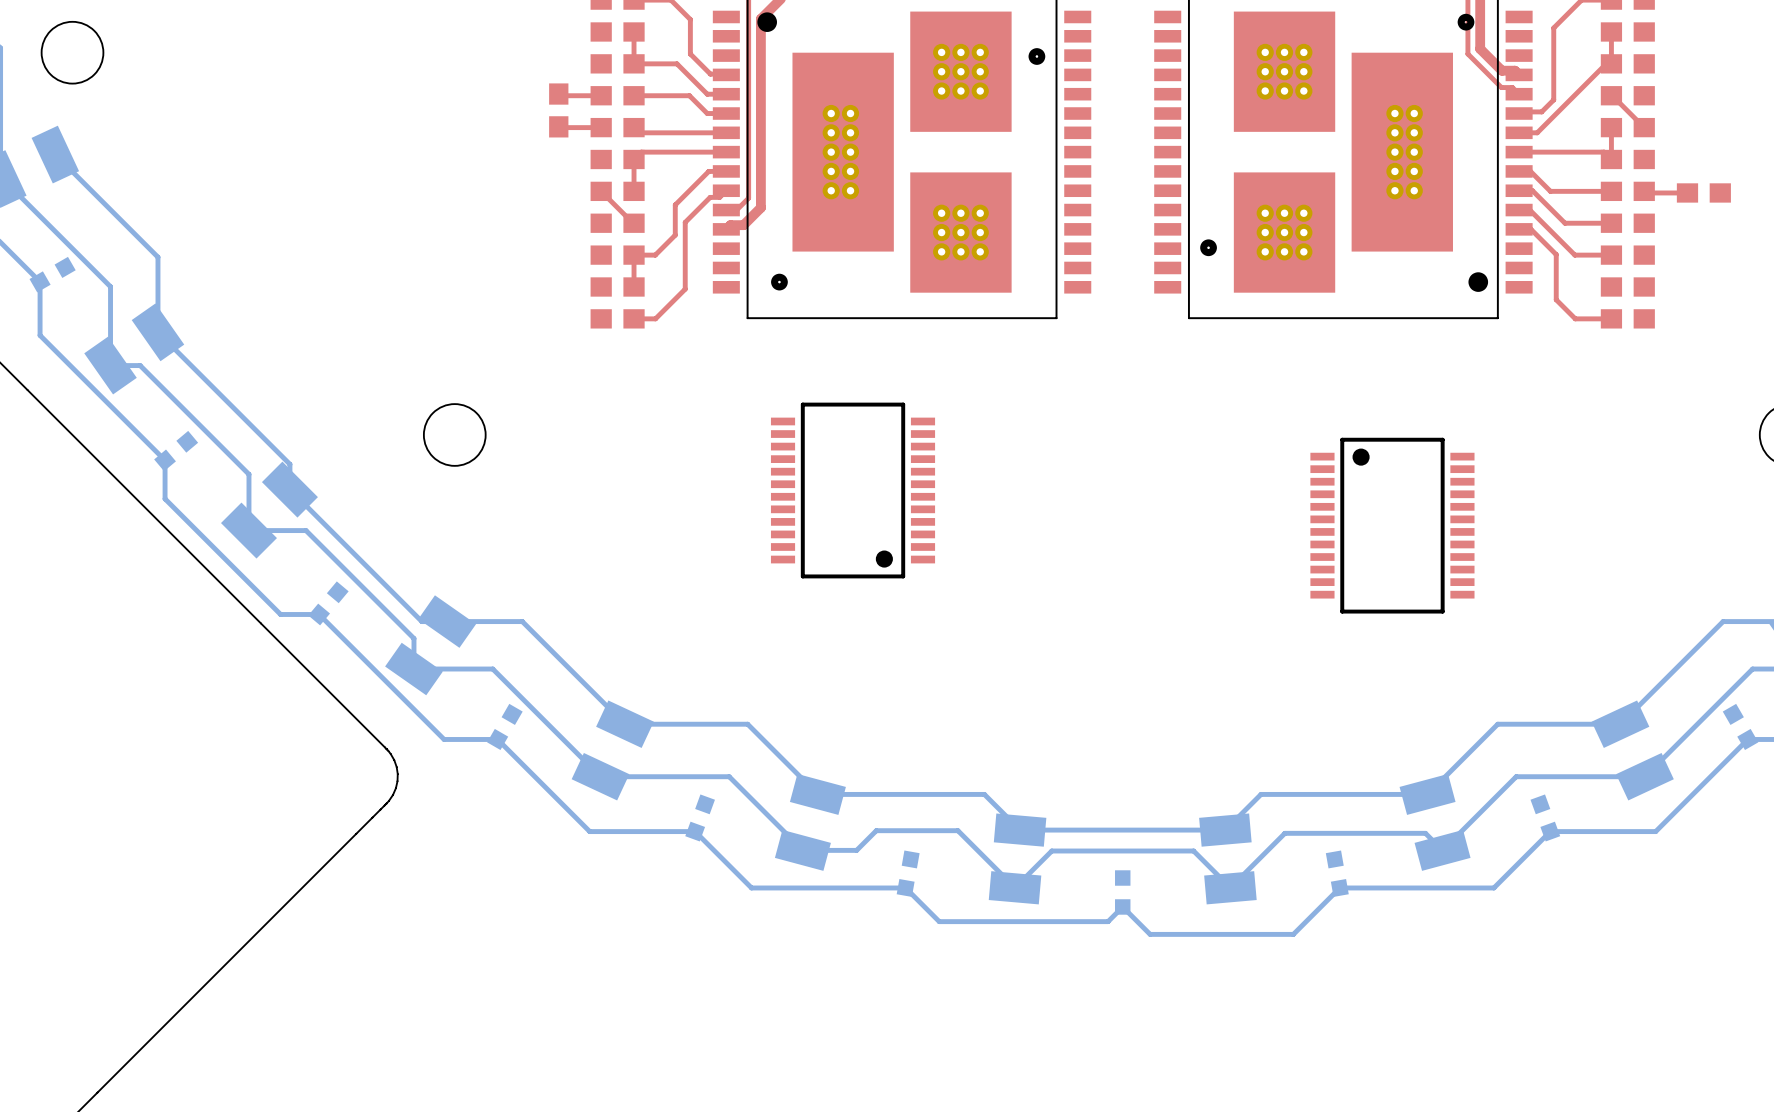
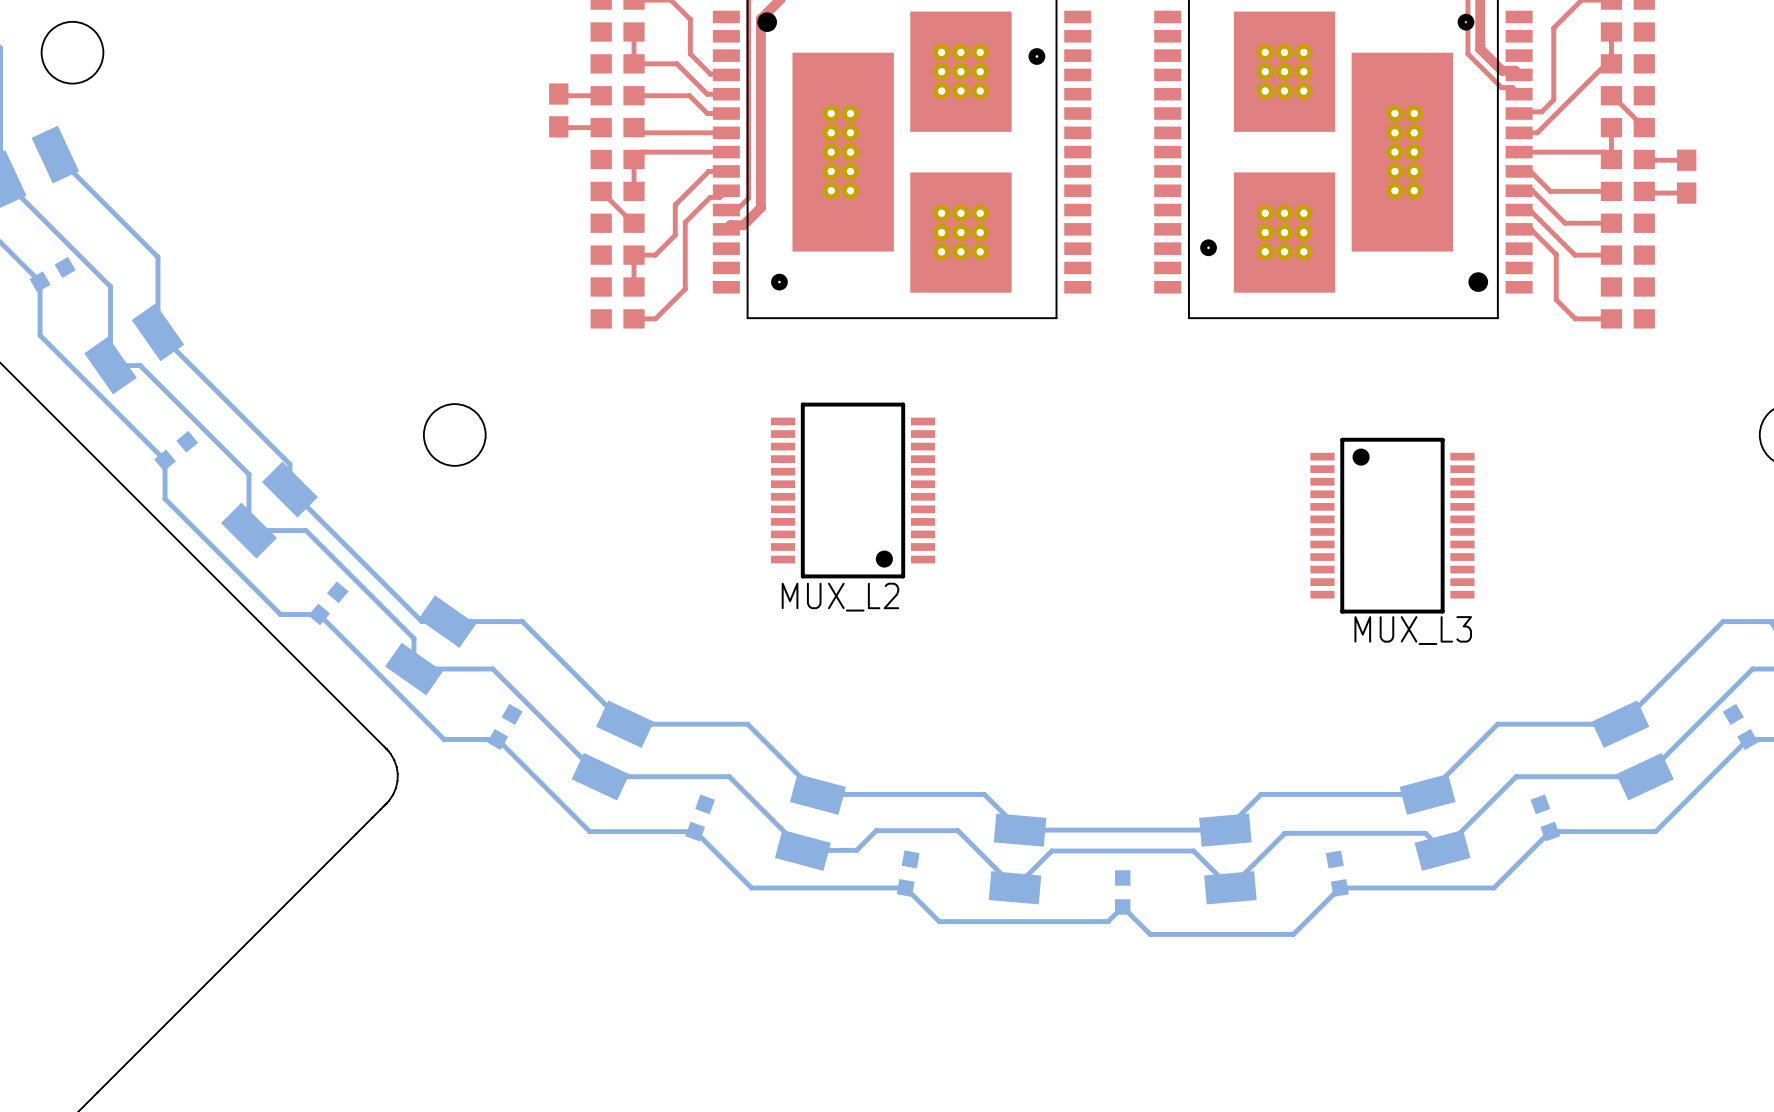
top track: none -> (1645, 160) (1686, 160)
part rotation: 0° (1703, 192) -> 90° clockwise (1686, 176)
MUX_L2 name: none -> MUX_L2 (840, 597)
MUX_L3 name: none -> MUX_L3 (1413, 630)

